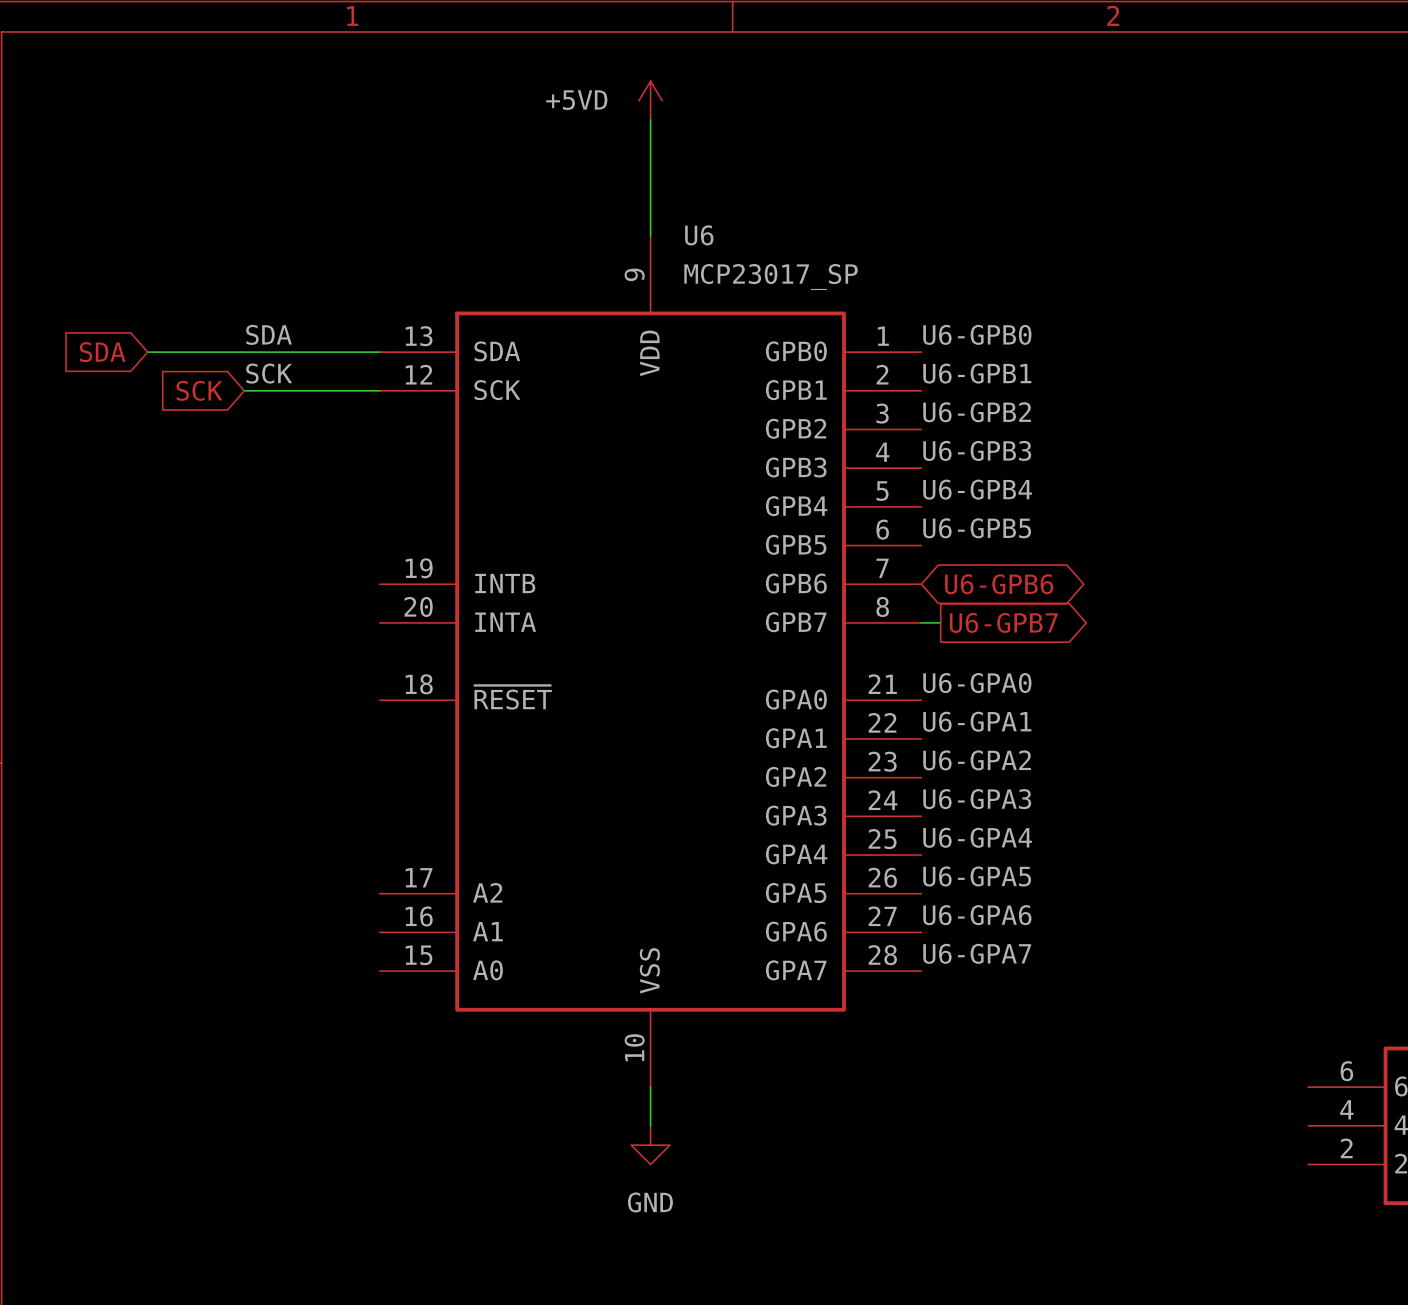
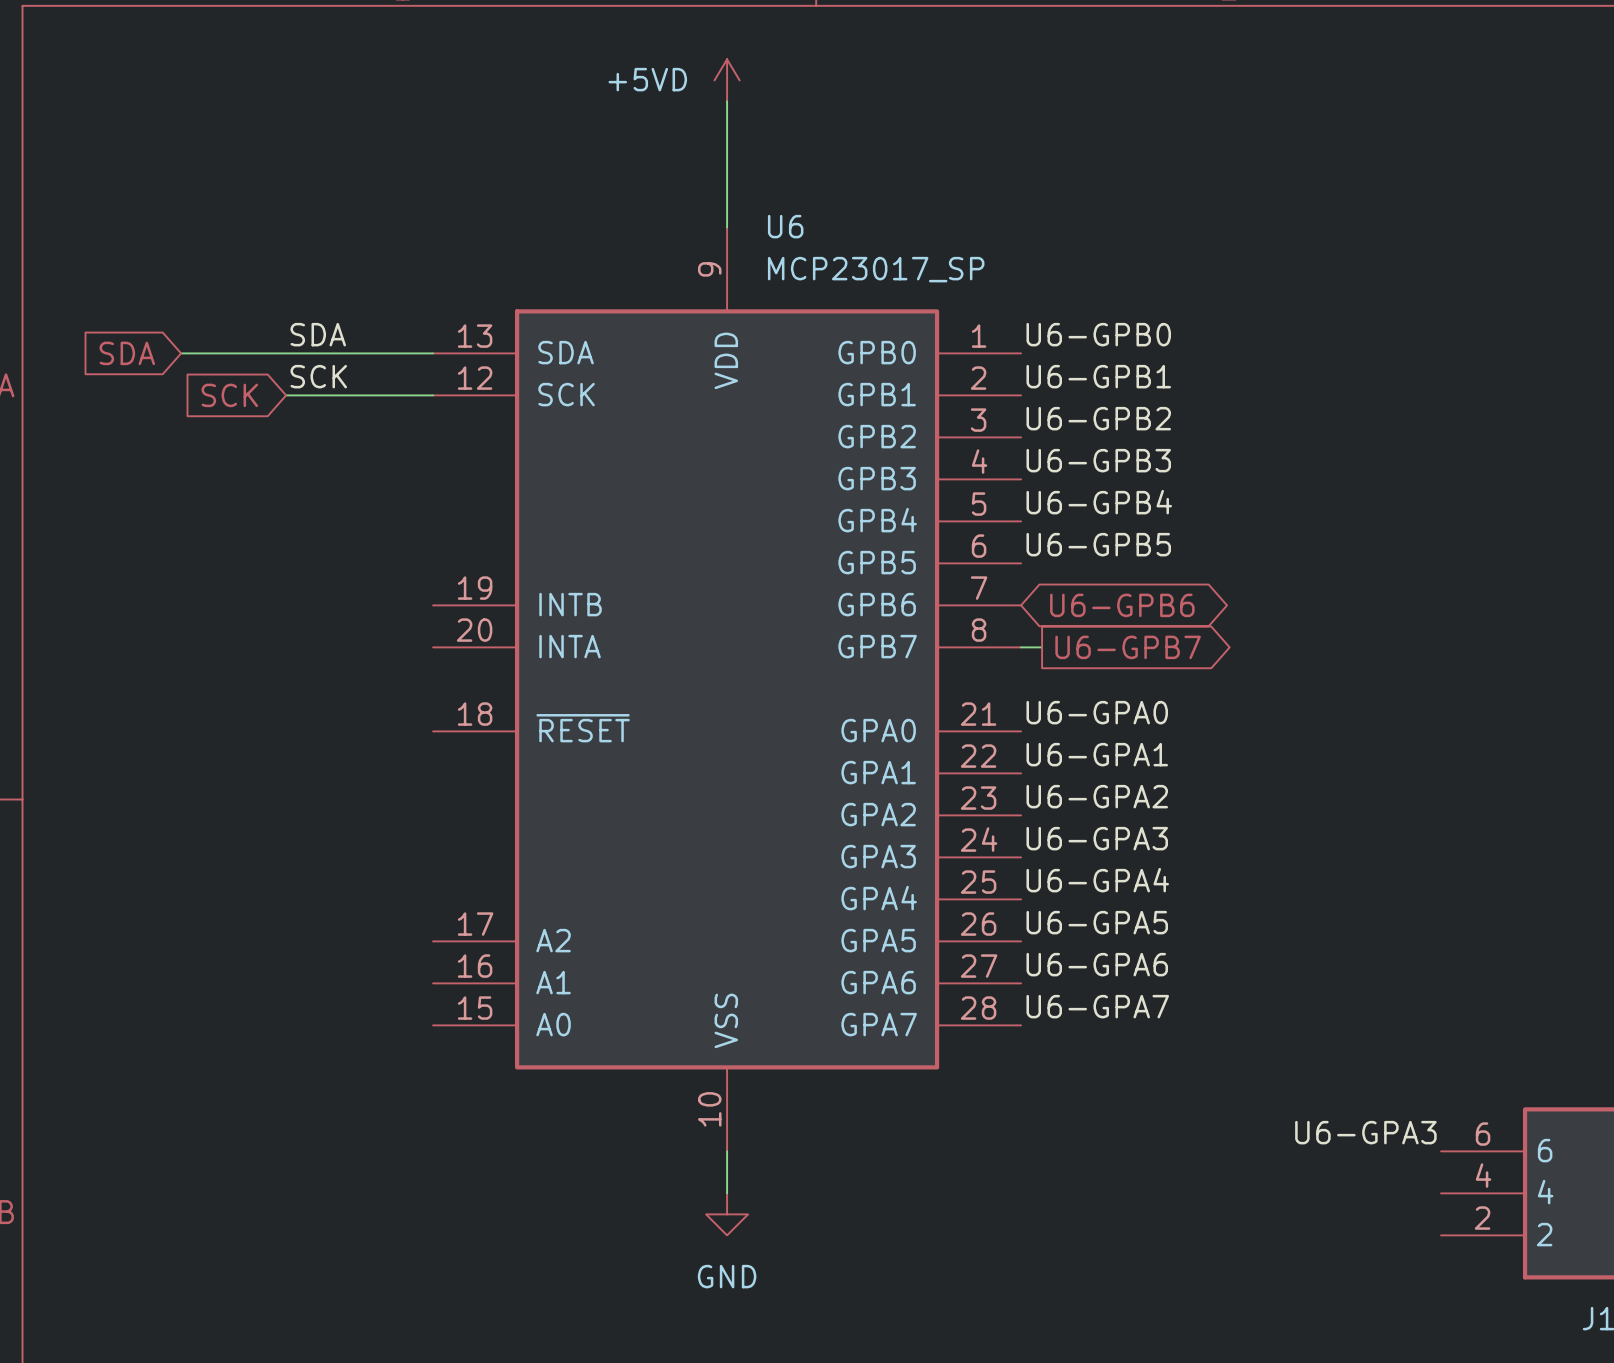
label: none -> U6-GPA3 (1365, 1132)

